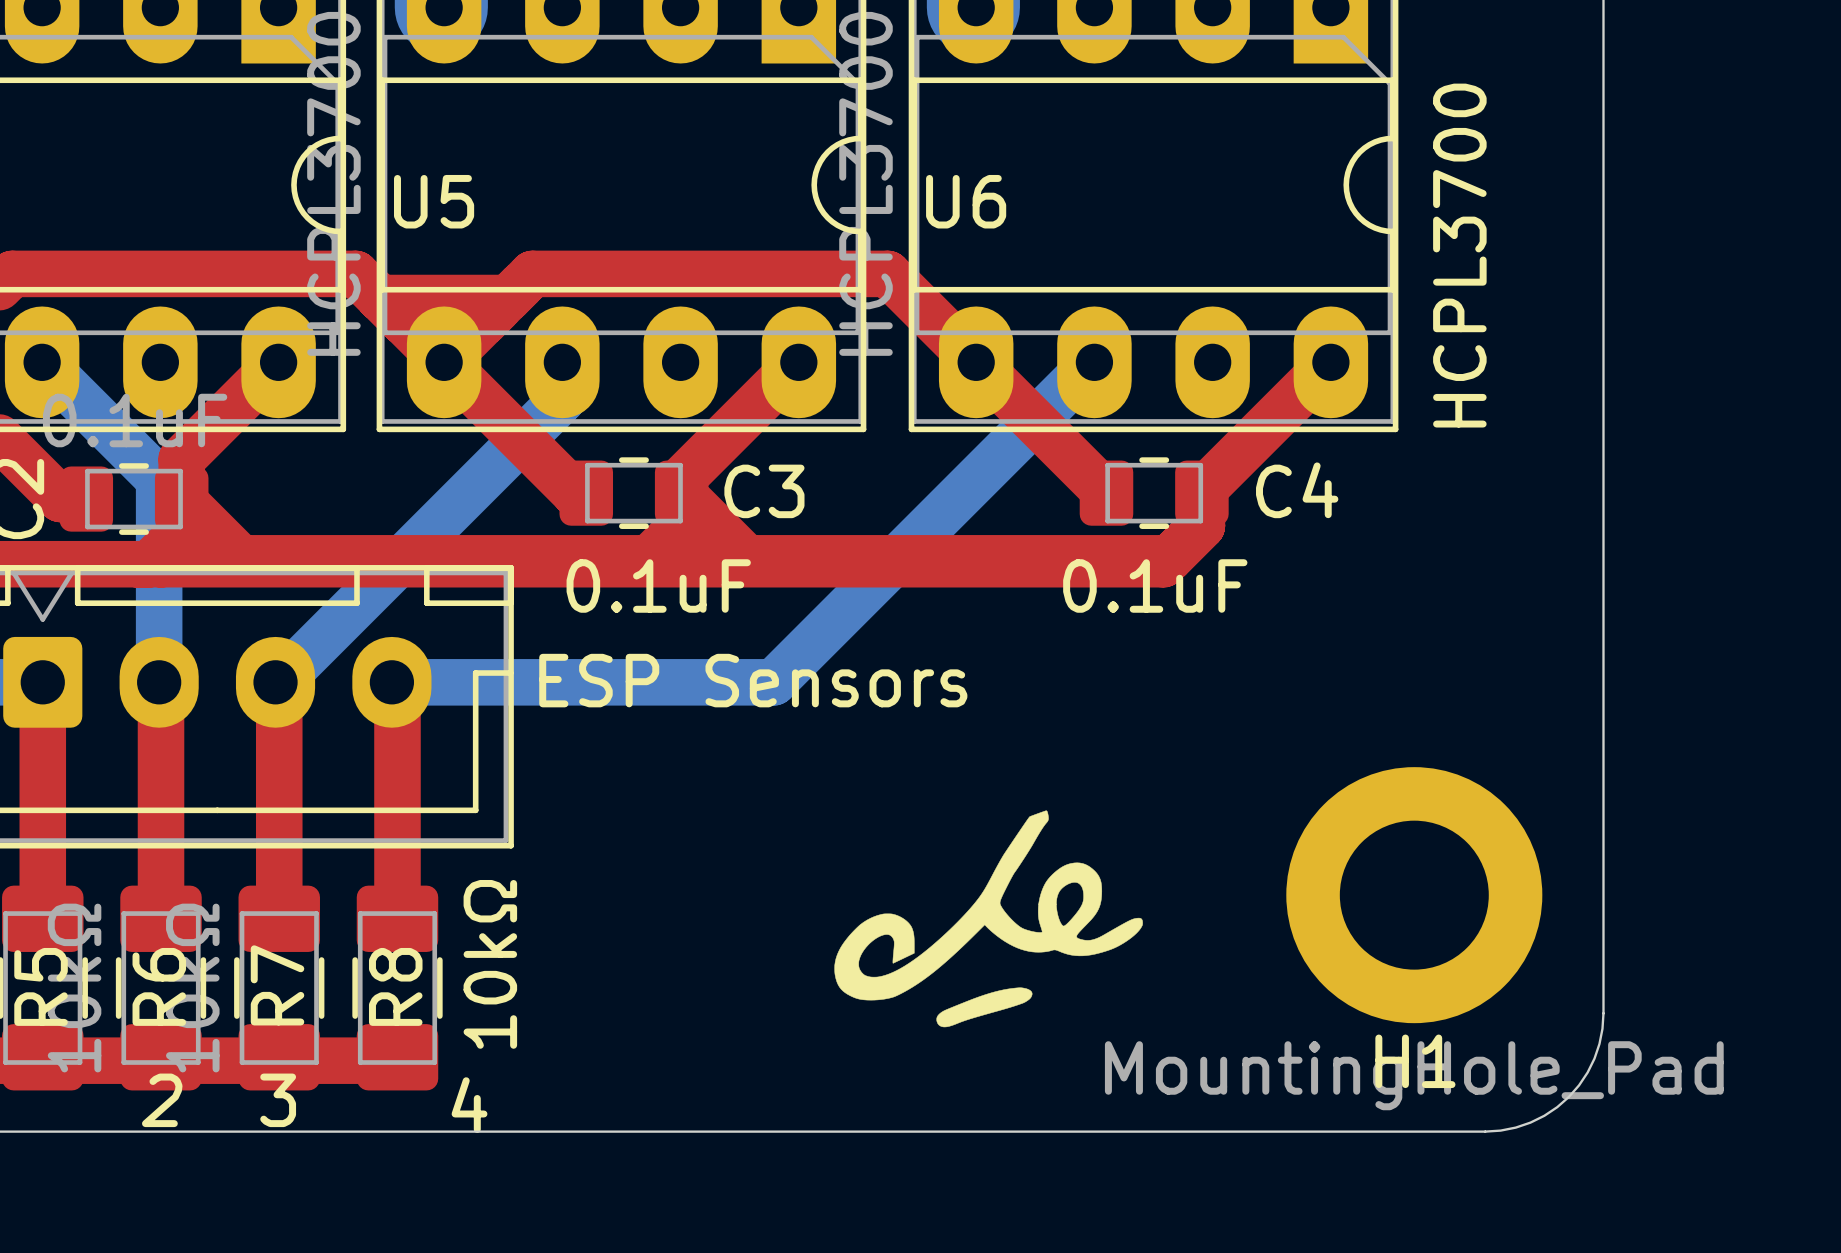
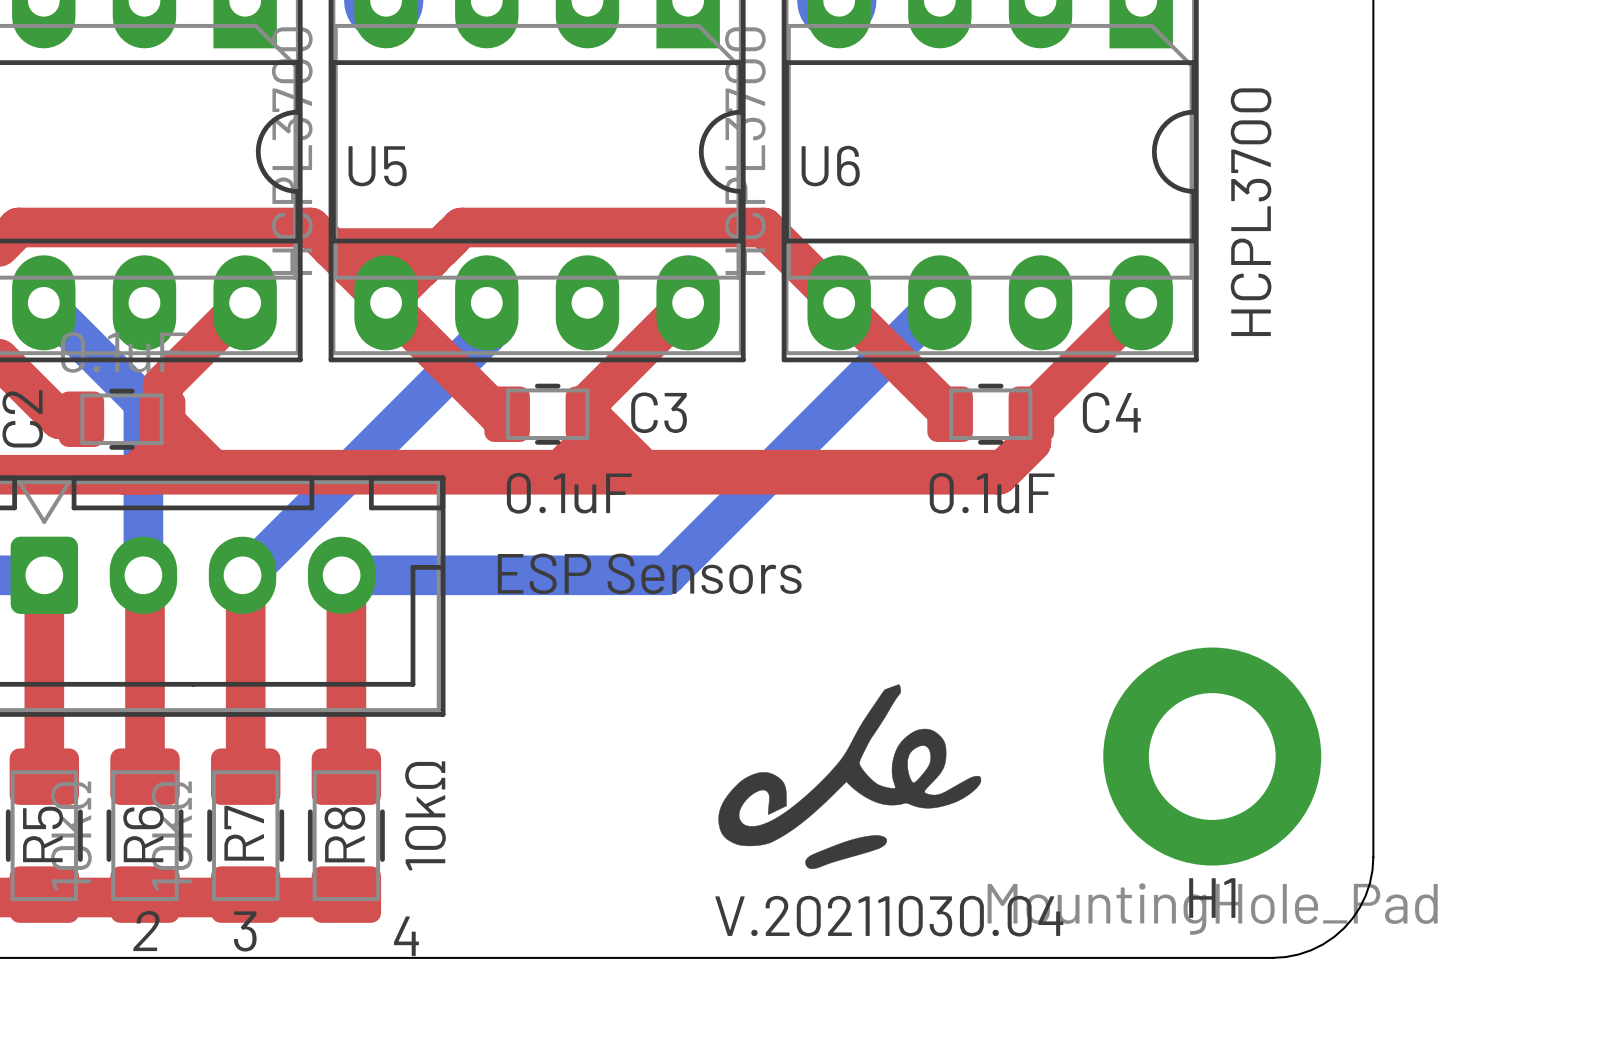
text: none -> V.20211030.04 (889, 916)

